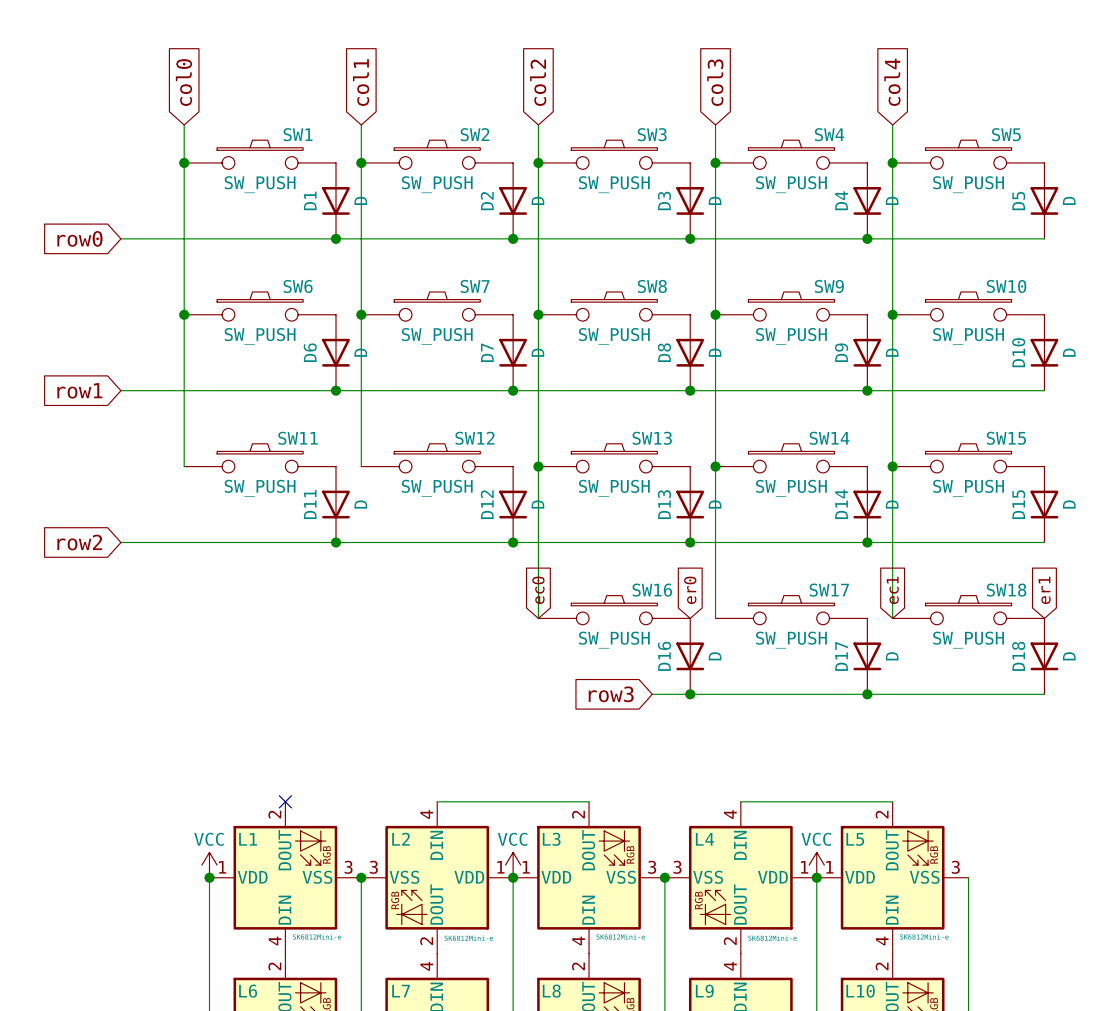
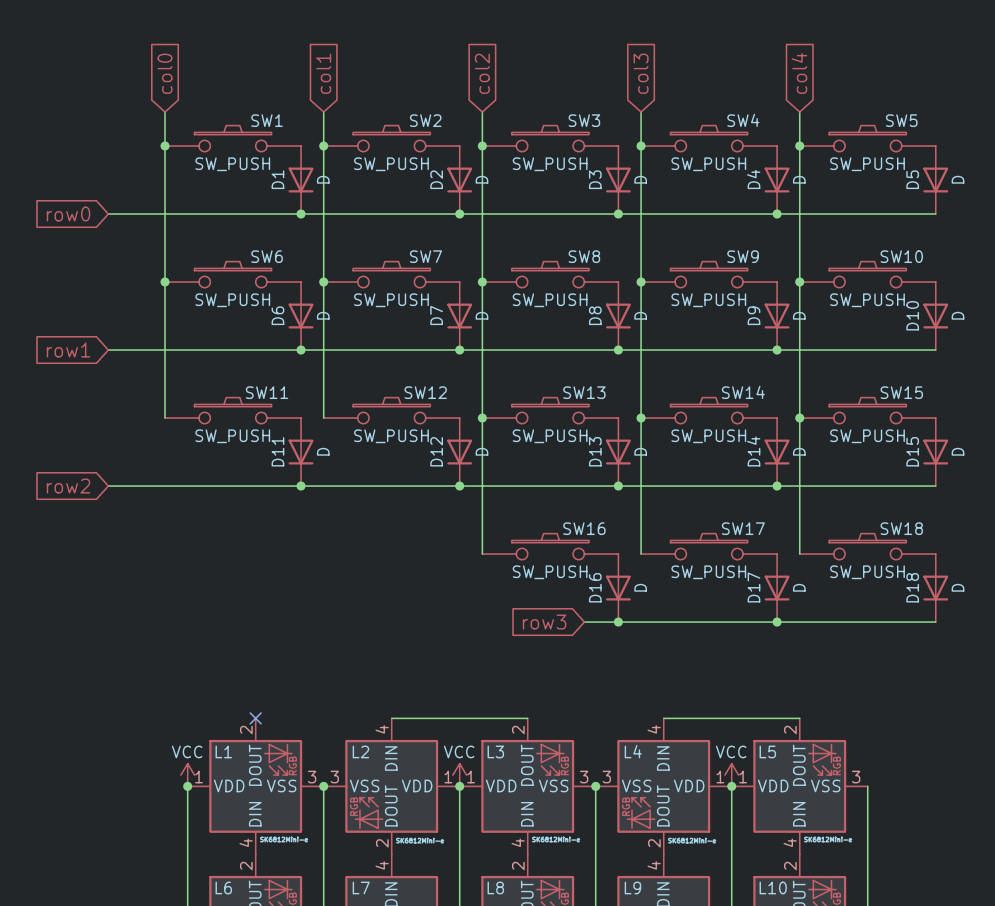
global label: ec0 (538, 590) -> none
global label: er0 (690, 590) -> none
global label: ec1 (892, 590) -> none
global label: er1 (1044, 590) -> none

